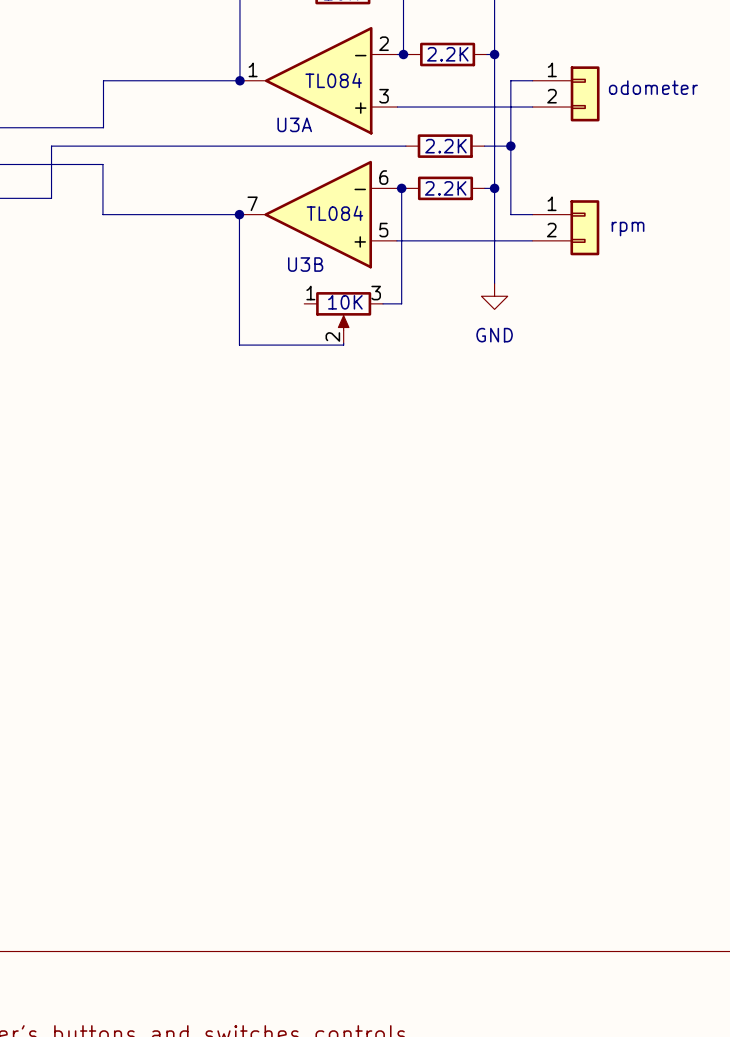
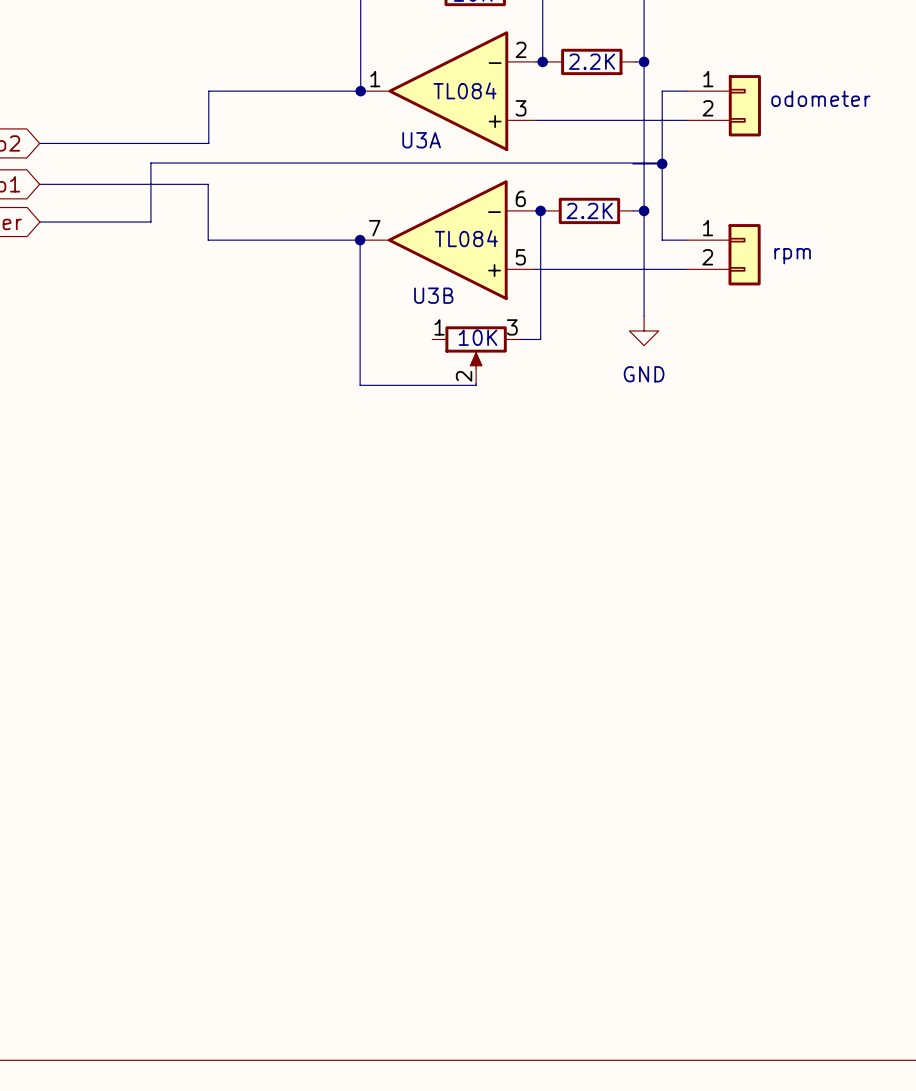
wire: (51, 146) (405, 146) -> (150, 163) (662, 163)
part: 2.2K (445, 146) -> none

